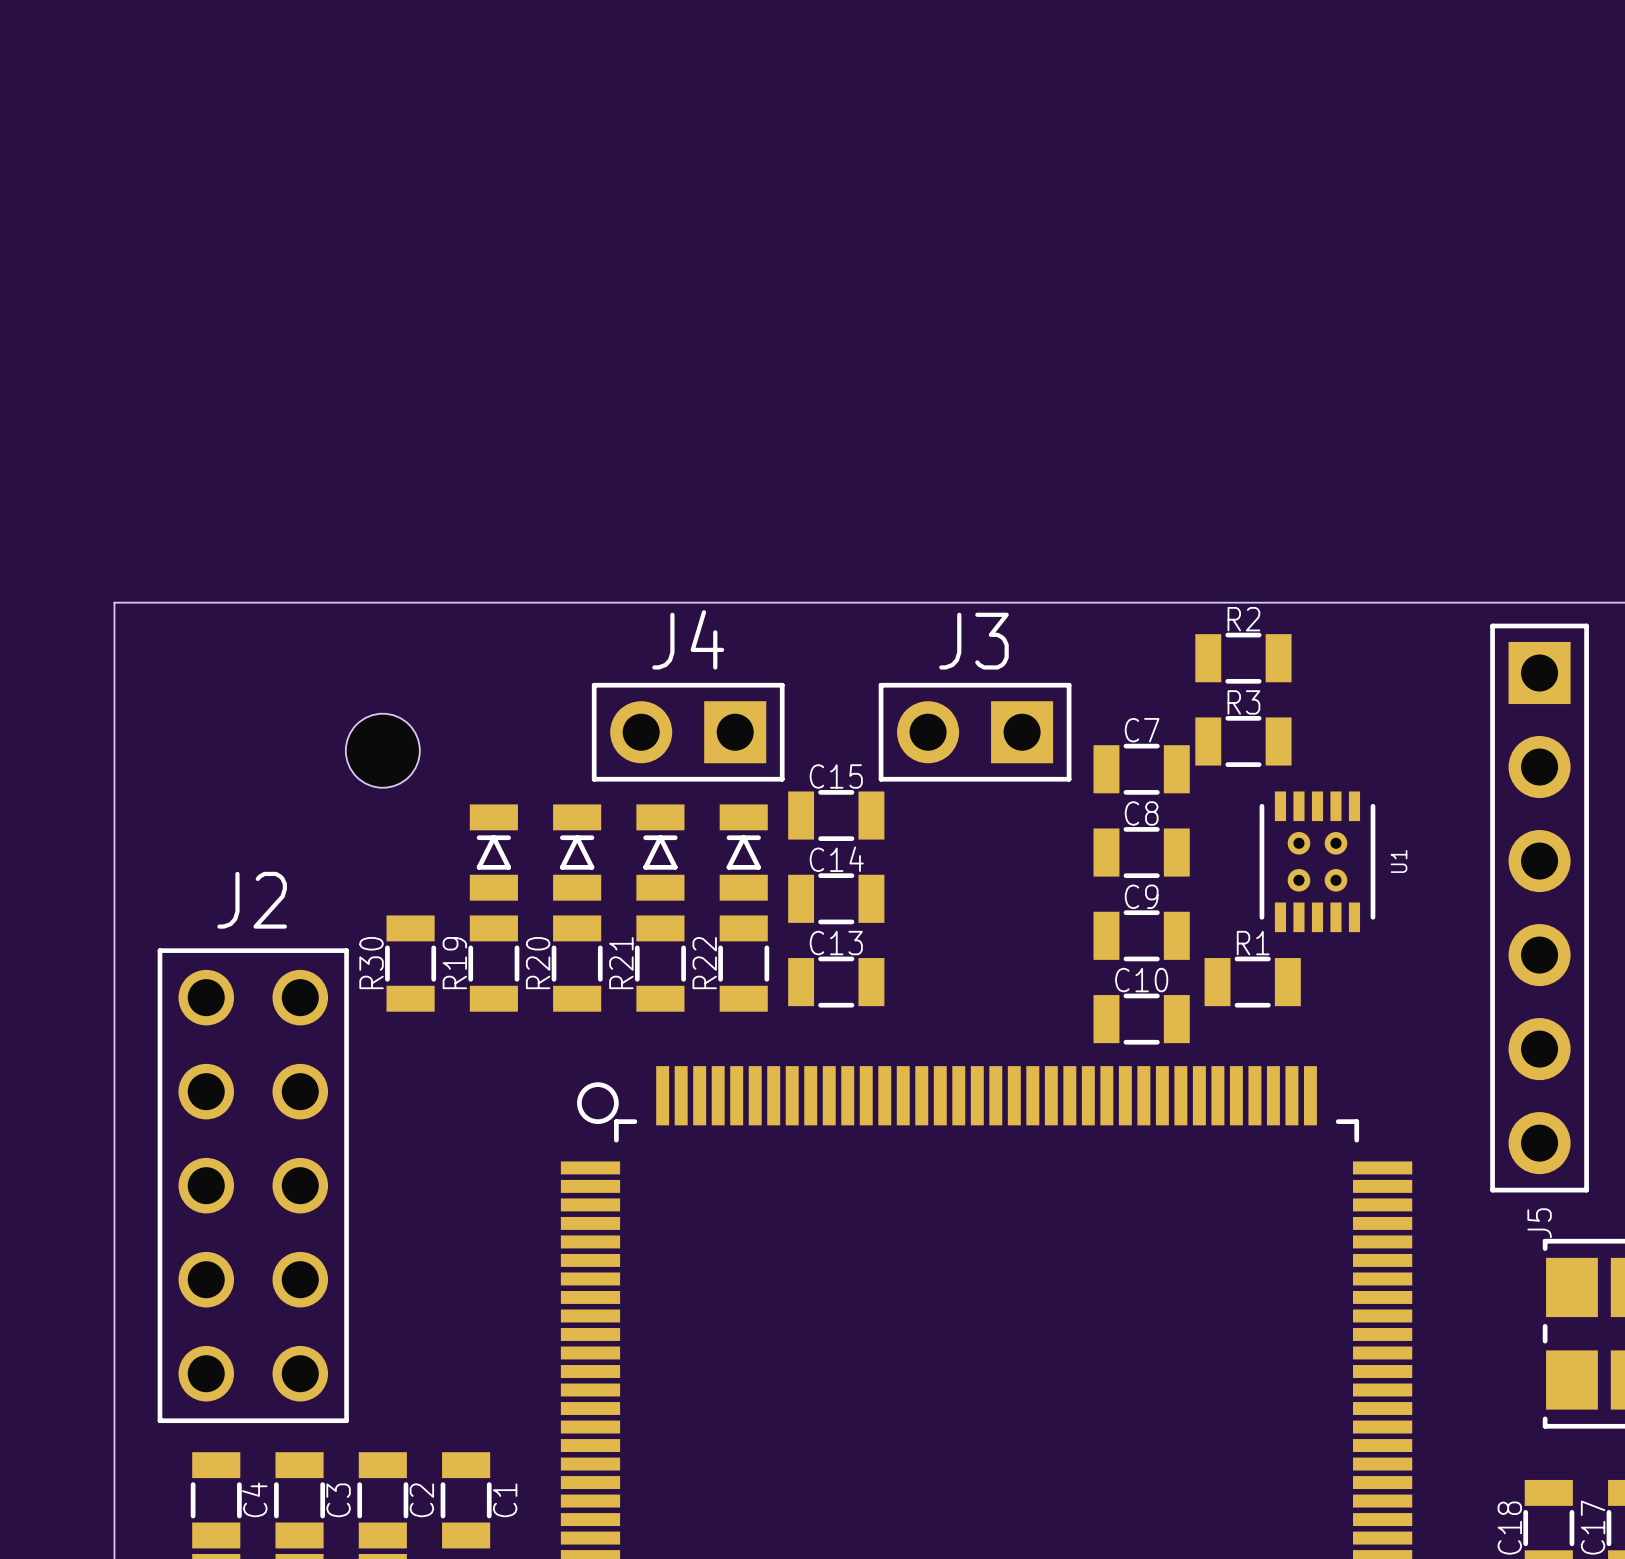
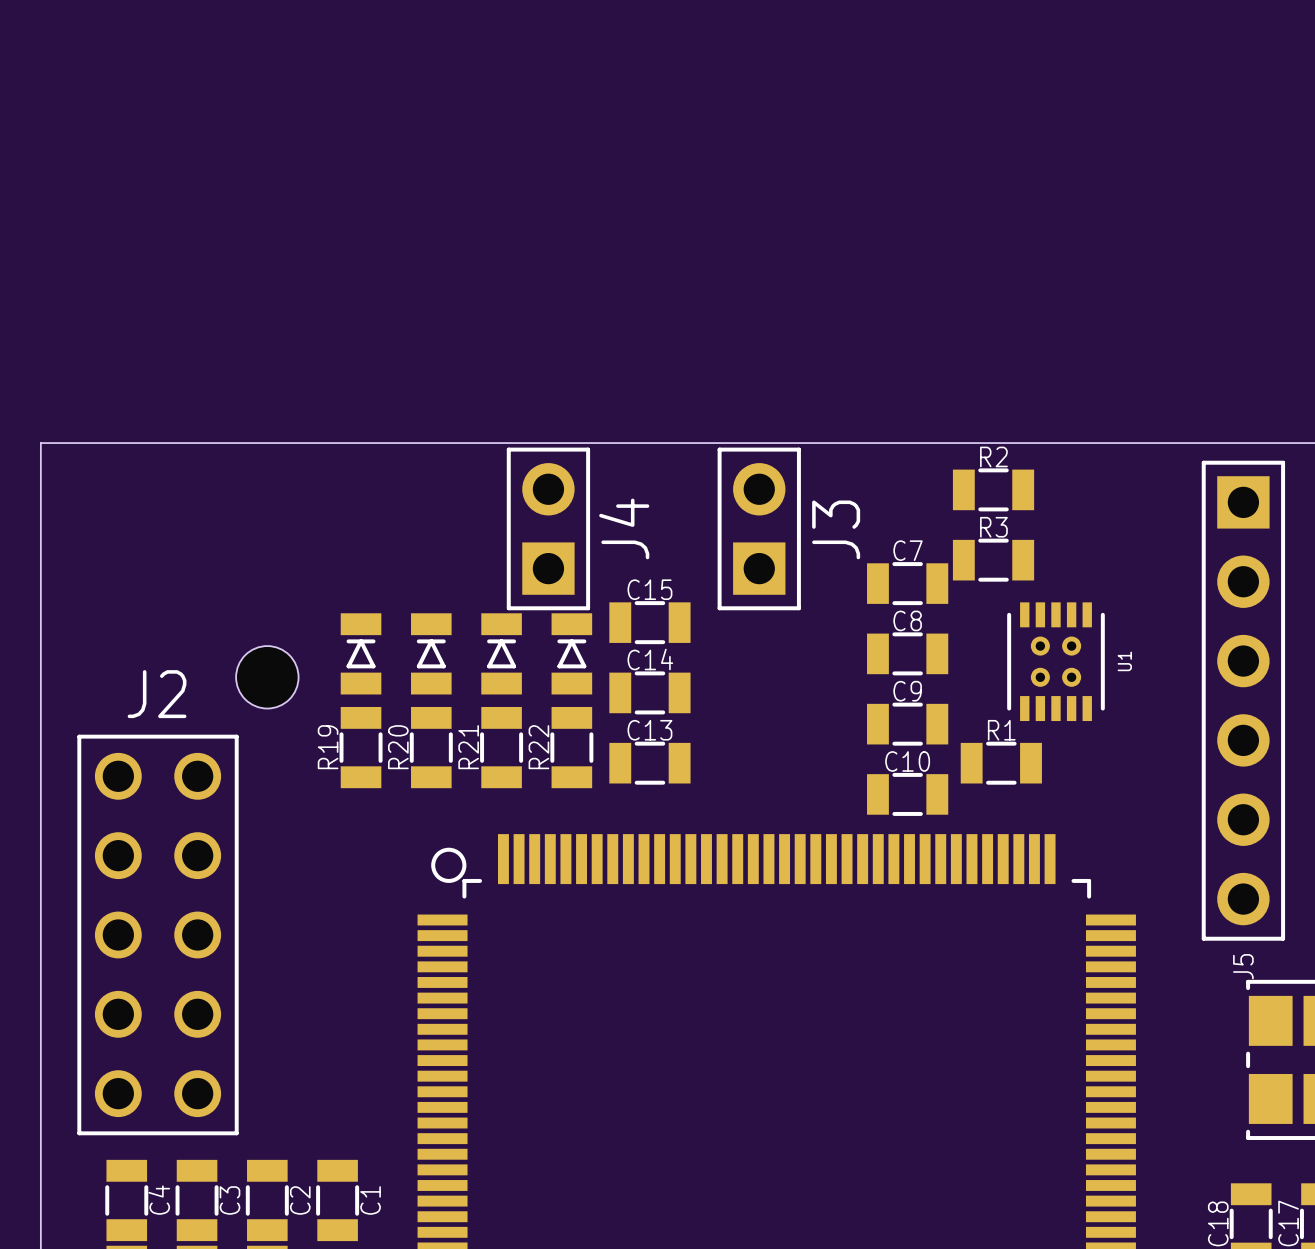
J4 rotation: 0° (688, 732) -> 90° clockwise (548, 528)
J3 rotation: 0° (975, 732) -> 90° clockwise (759, 528)
hole position: (382, 750) -> (267, 677)
R30: (410, 963) -> none

